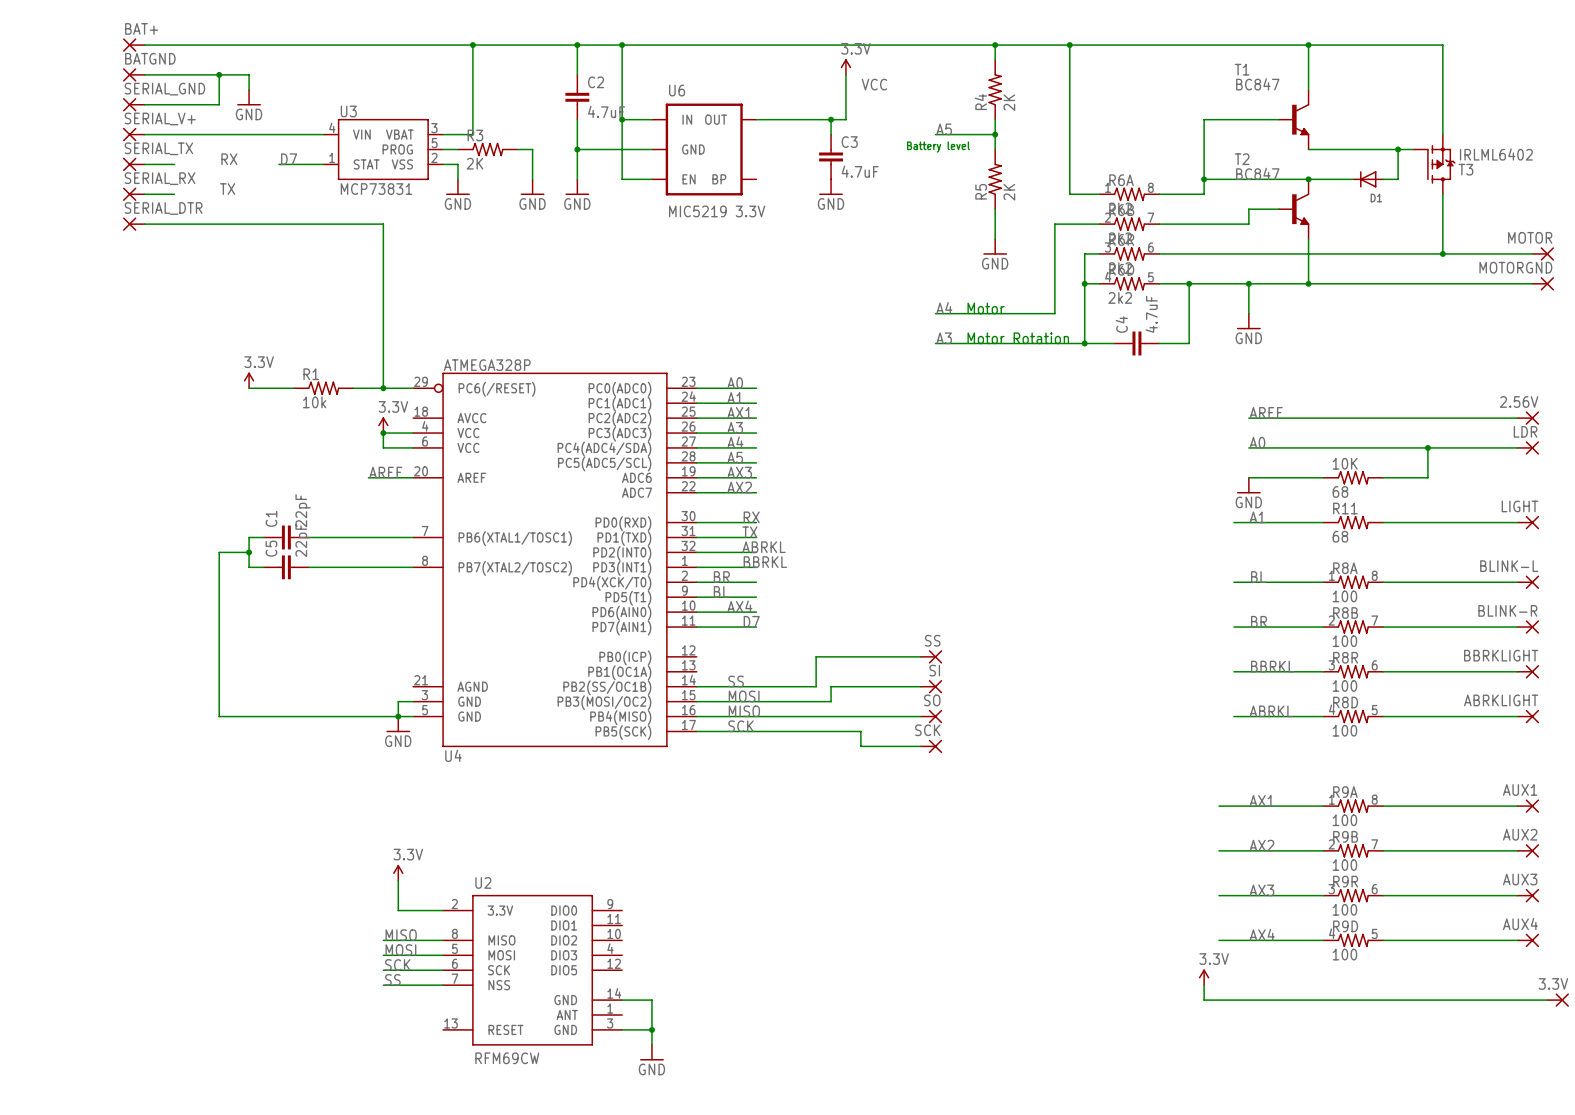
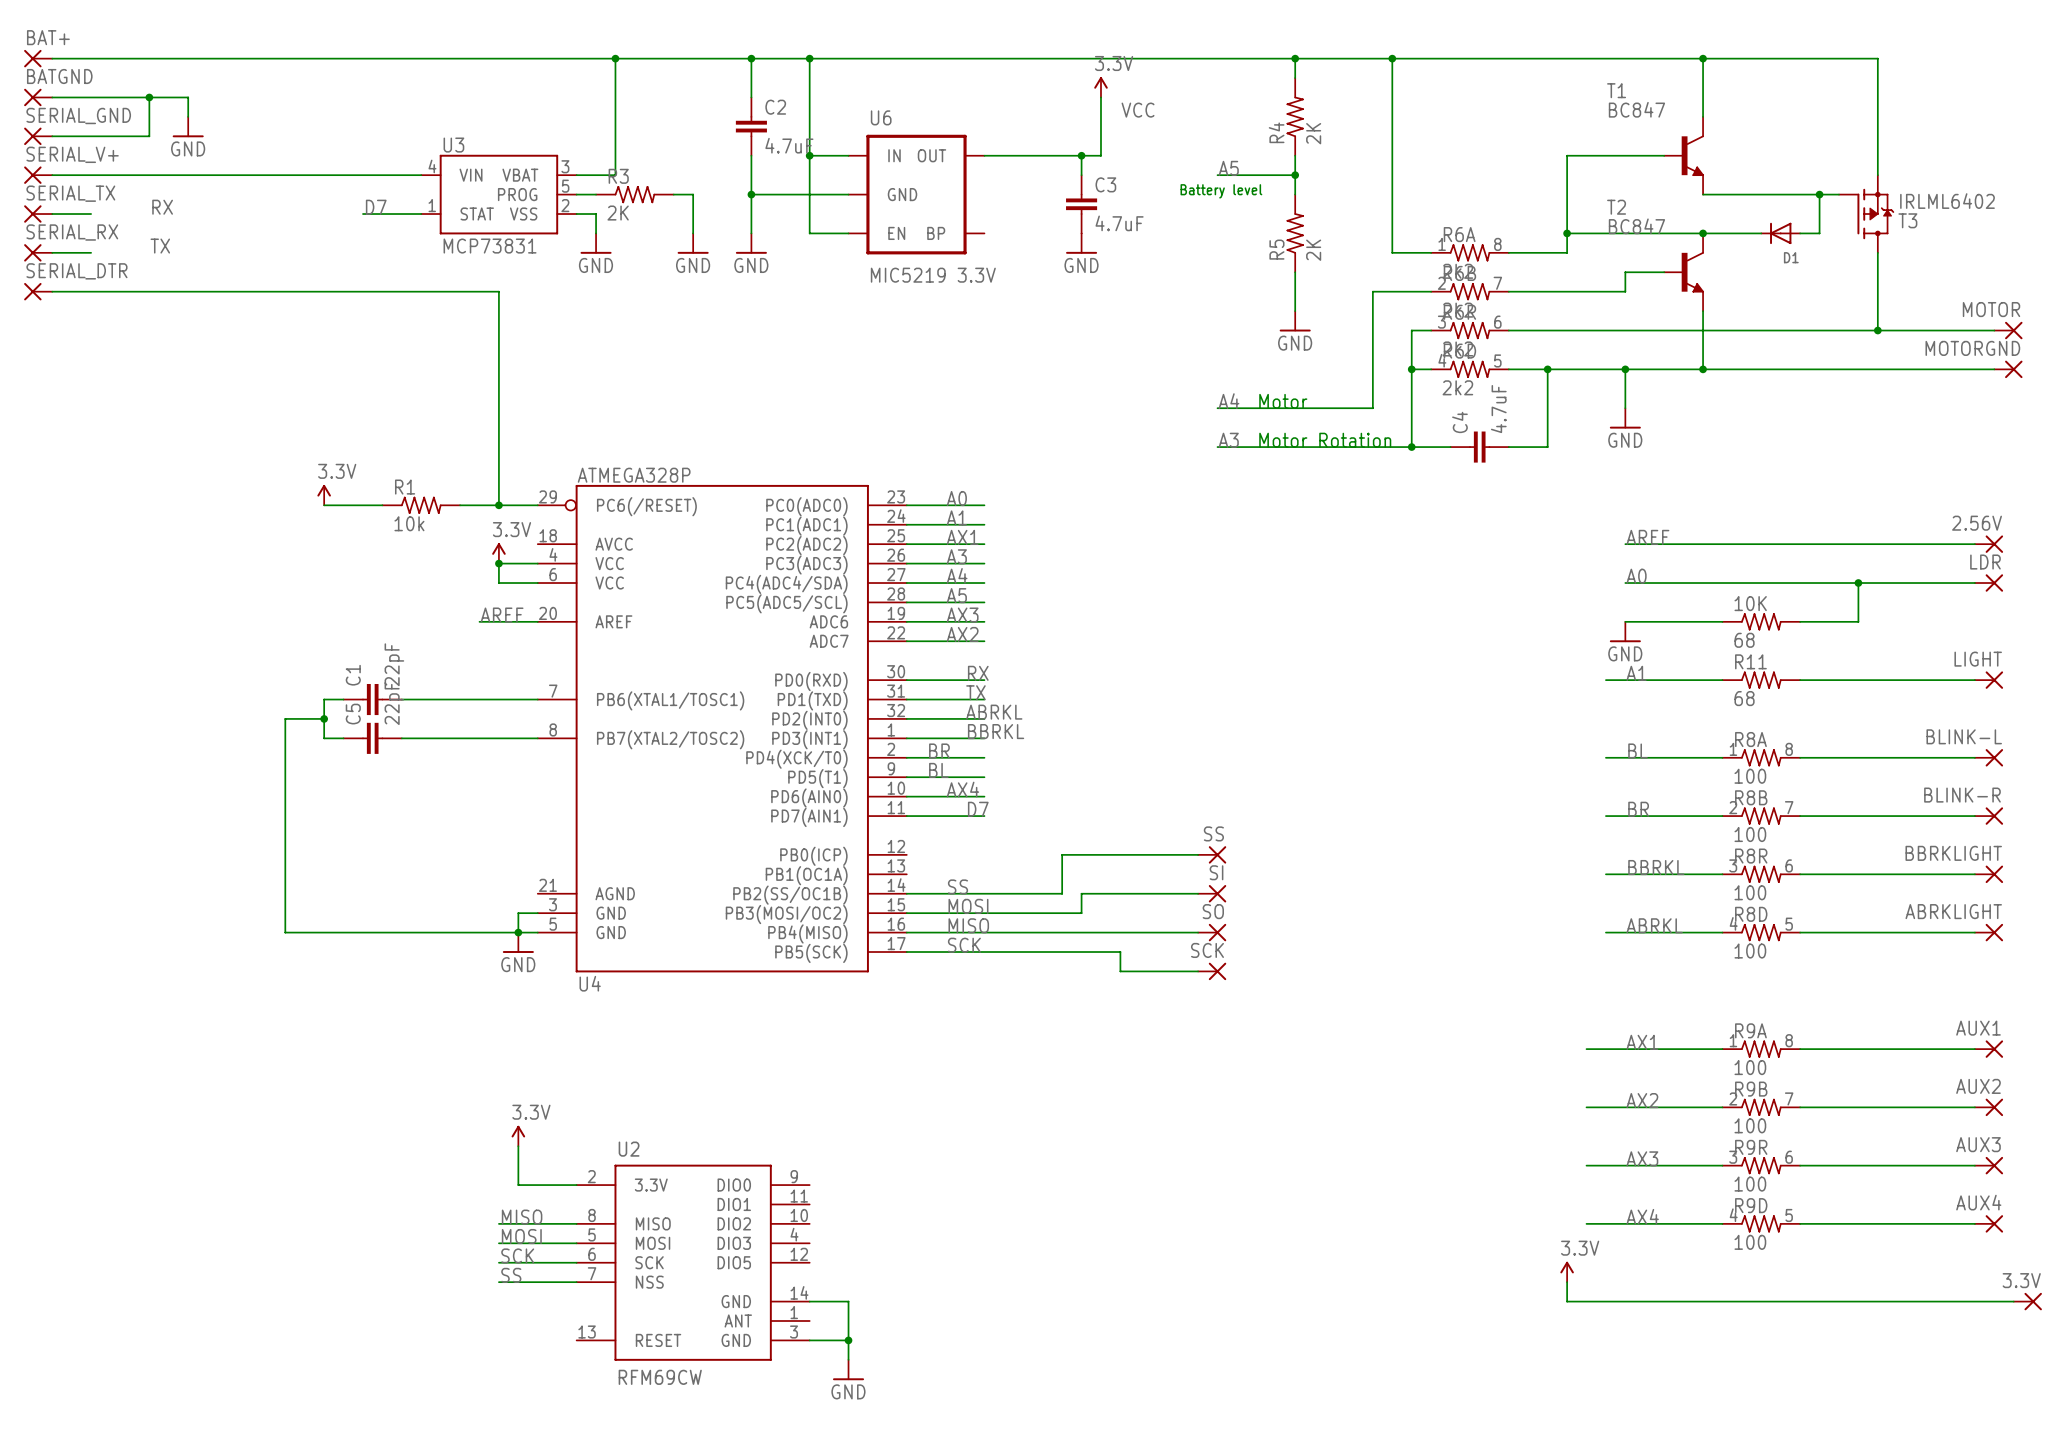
wire: none -> (52, 58) (188, 58)
BAT+ position: (133, 45) -> (38, 58)
junction: none -> (149, 97)
BATGND position: (133, 74) -> (38, 97)
wire: (144, 74) (249, 74) (249, 89) -> (52, 97) (188, 97) (188, 116)
wire: (219, 74) (219, 104) (144, 104) -> (149, 97) (149, 136) (52, 136)
junction: (219, 74) -> none
power symbol position: GND (249, 97) -> GND (188, 127)
SERIAL_GND position: (133, 104) -> (38, 136)
wire: none -> (52, 175) (188, 175)
SERIAL_V+ position: (133, 134) -> (38, 175)
label position: RX (229, 159) -> RX (162, 207)
SERIAL_TX position: (133, 164) -> (38, 214)
wire: (144, 164) (174, 164) -> (52, 214) (91, 214)
label position: TX (227, 189) -> TX (160, 246)
SERIAL_RX position: (133, 194) -> (38, 252)
wire: (144, 194) (174, 194) -> (52, 252) (91, 252)
wire: none -> (52, 291) (188, 291)
SERIAL_DTR position: (133, 224) -> (38, 291)

